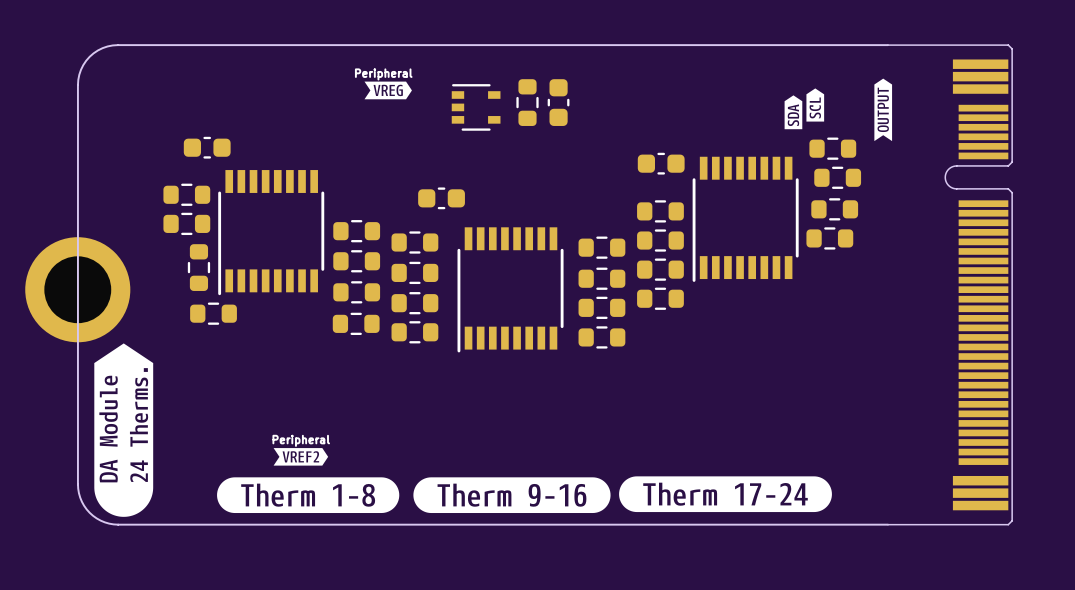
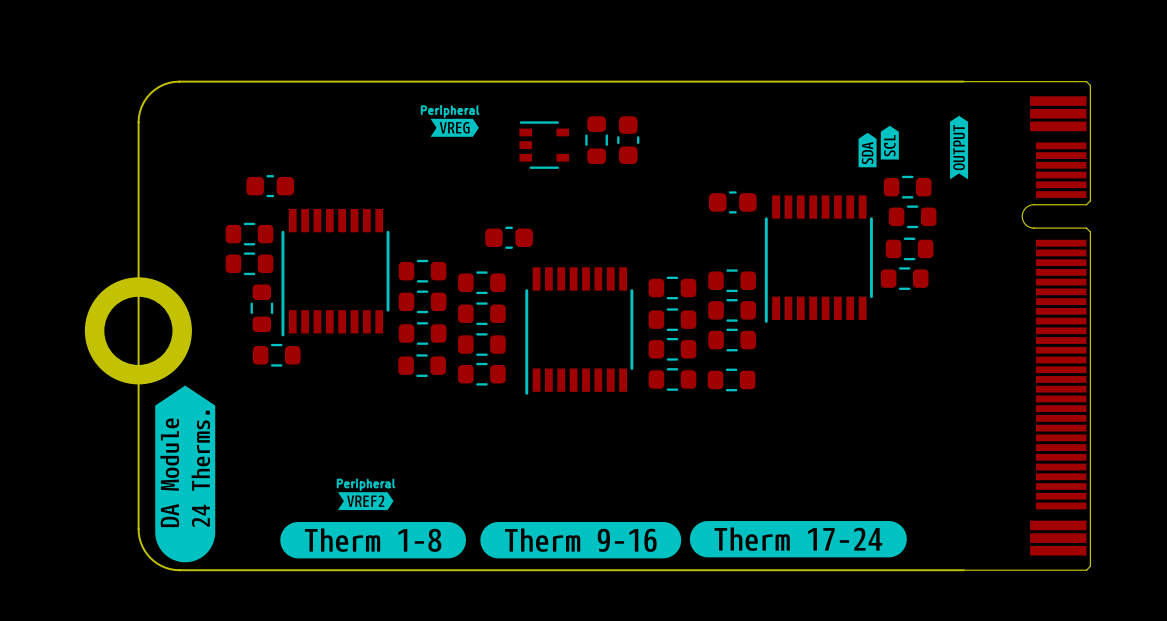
part position: (660, 211) -> (731, 379)

